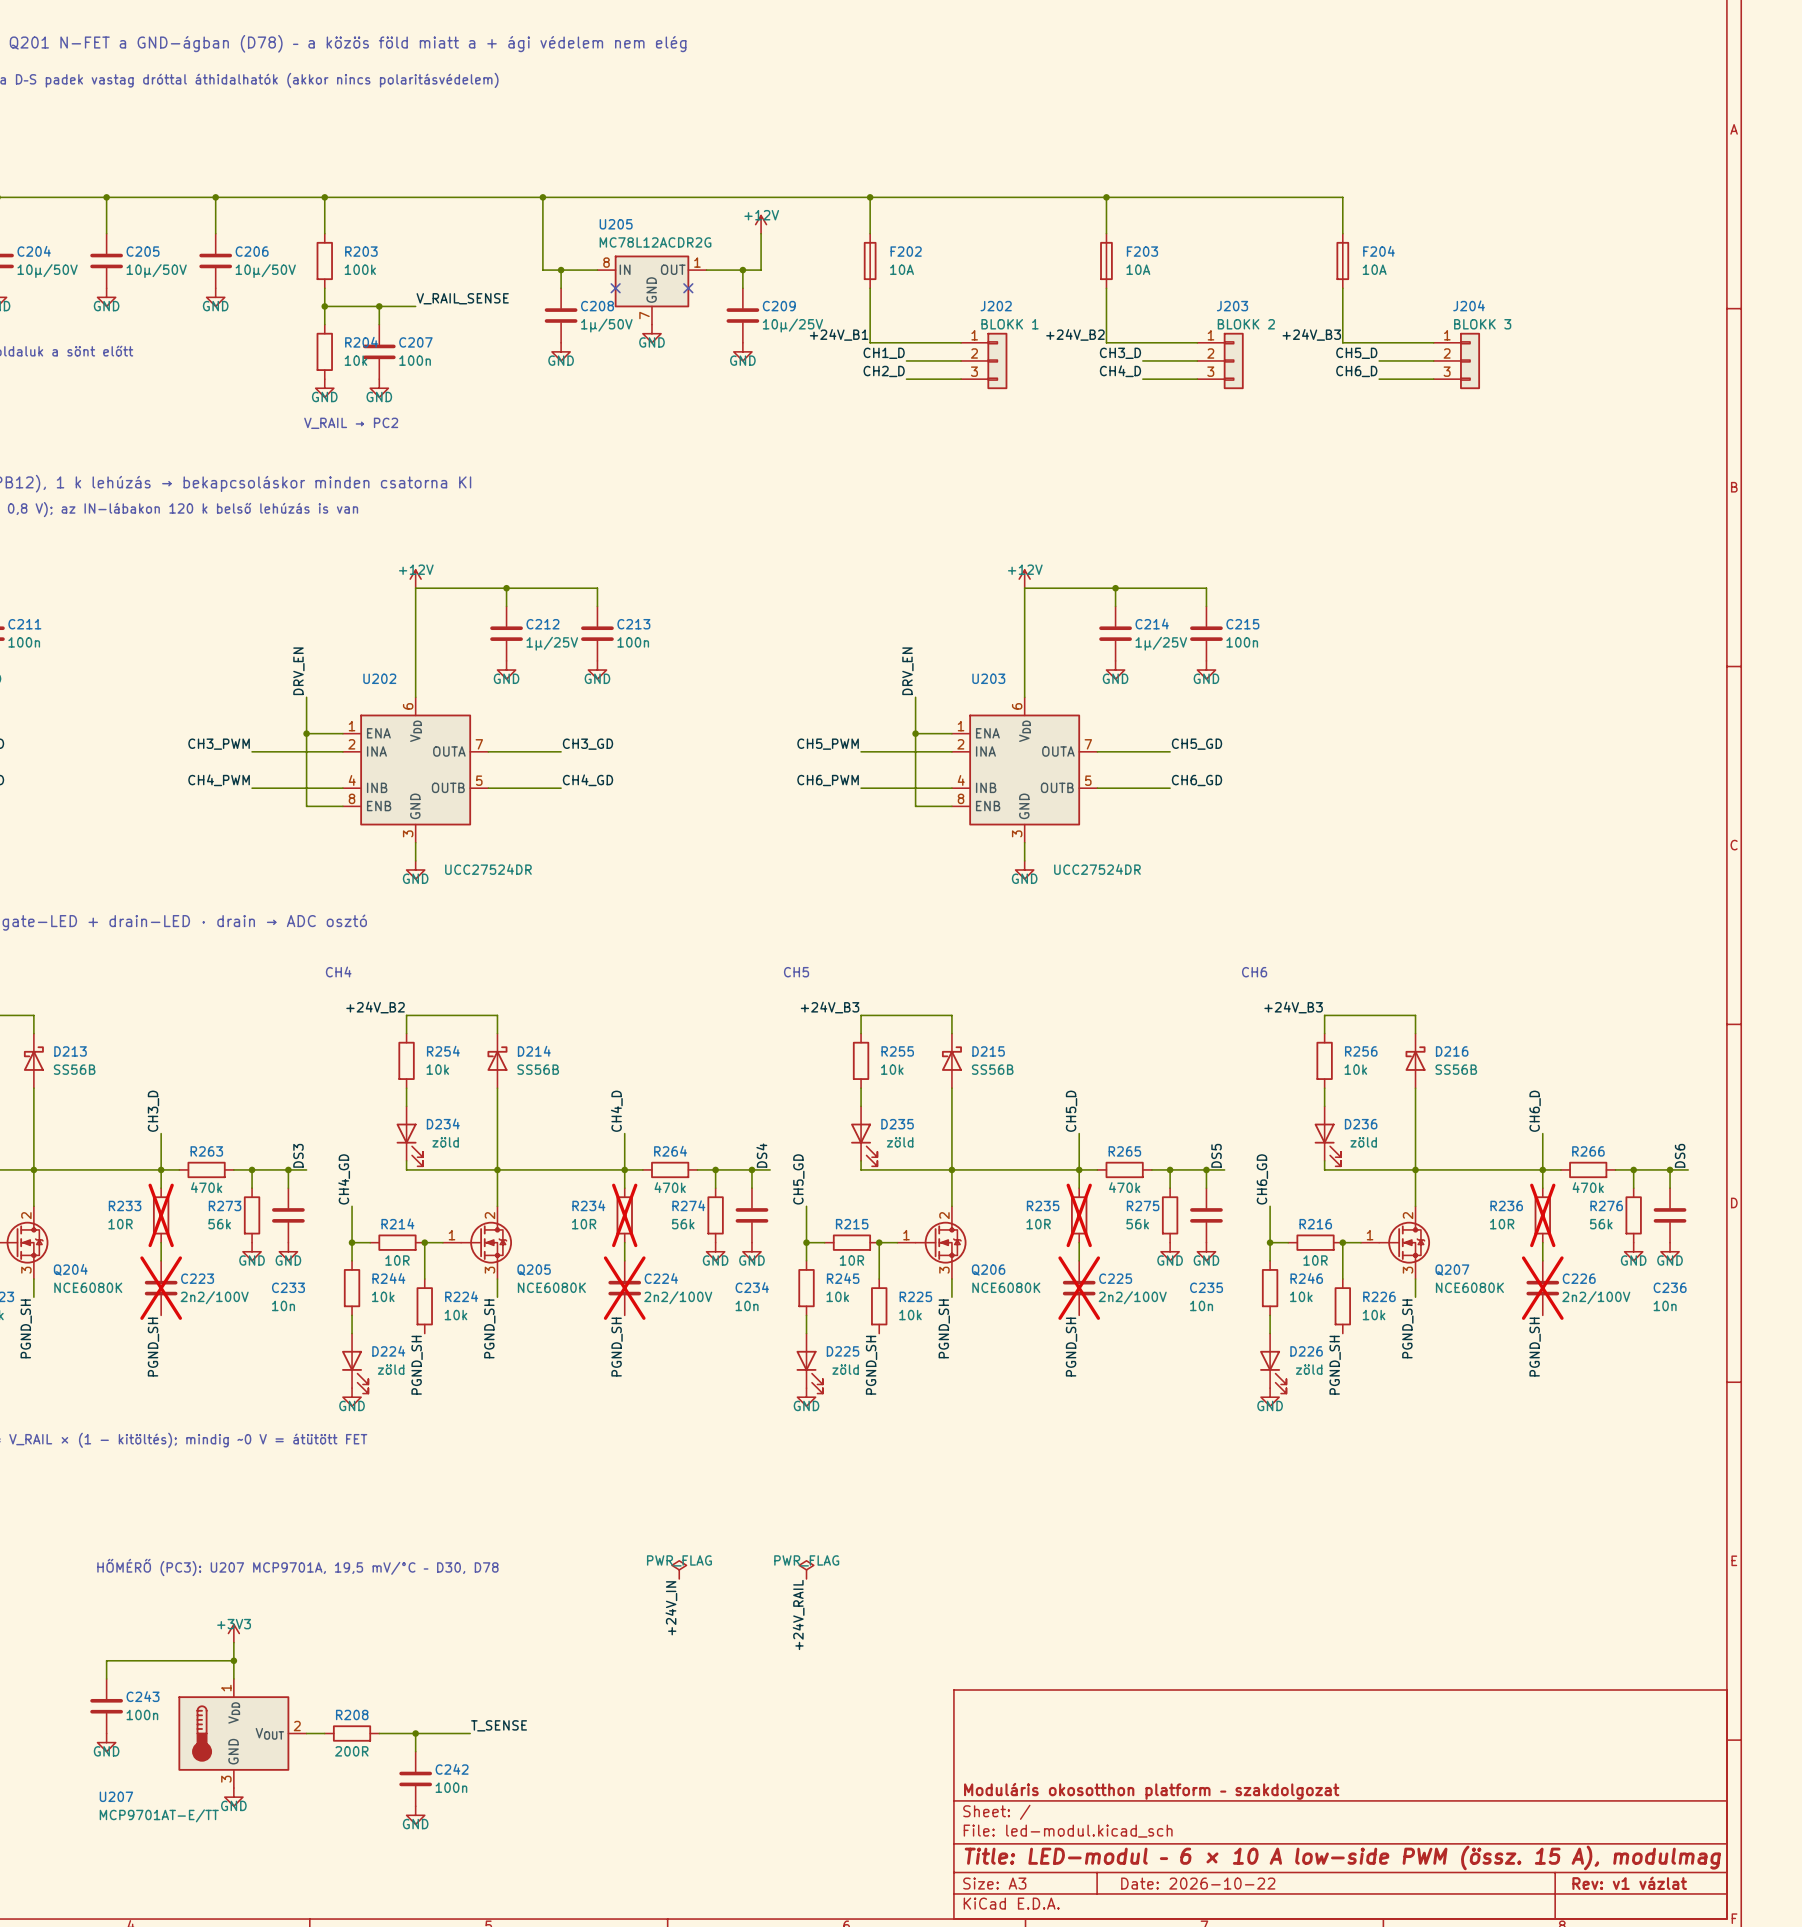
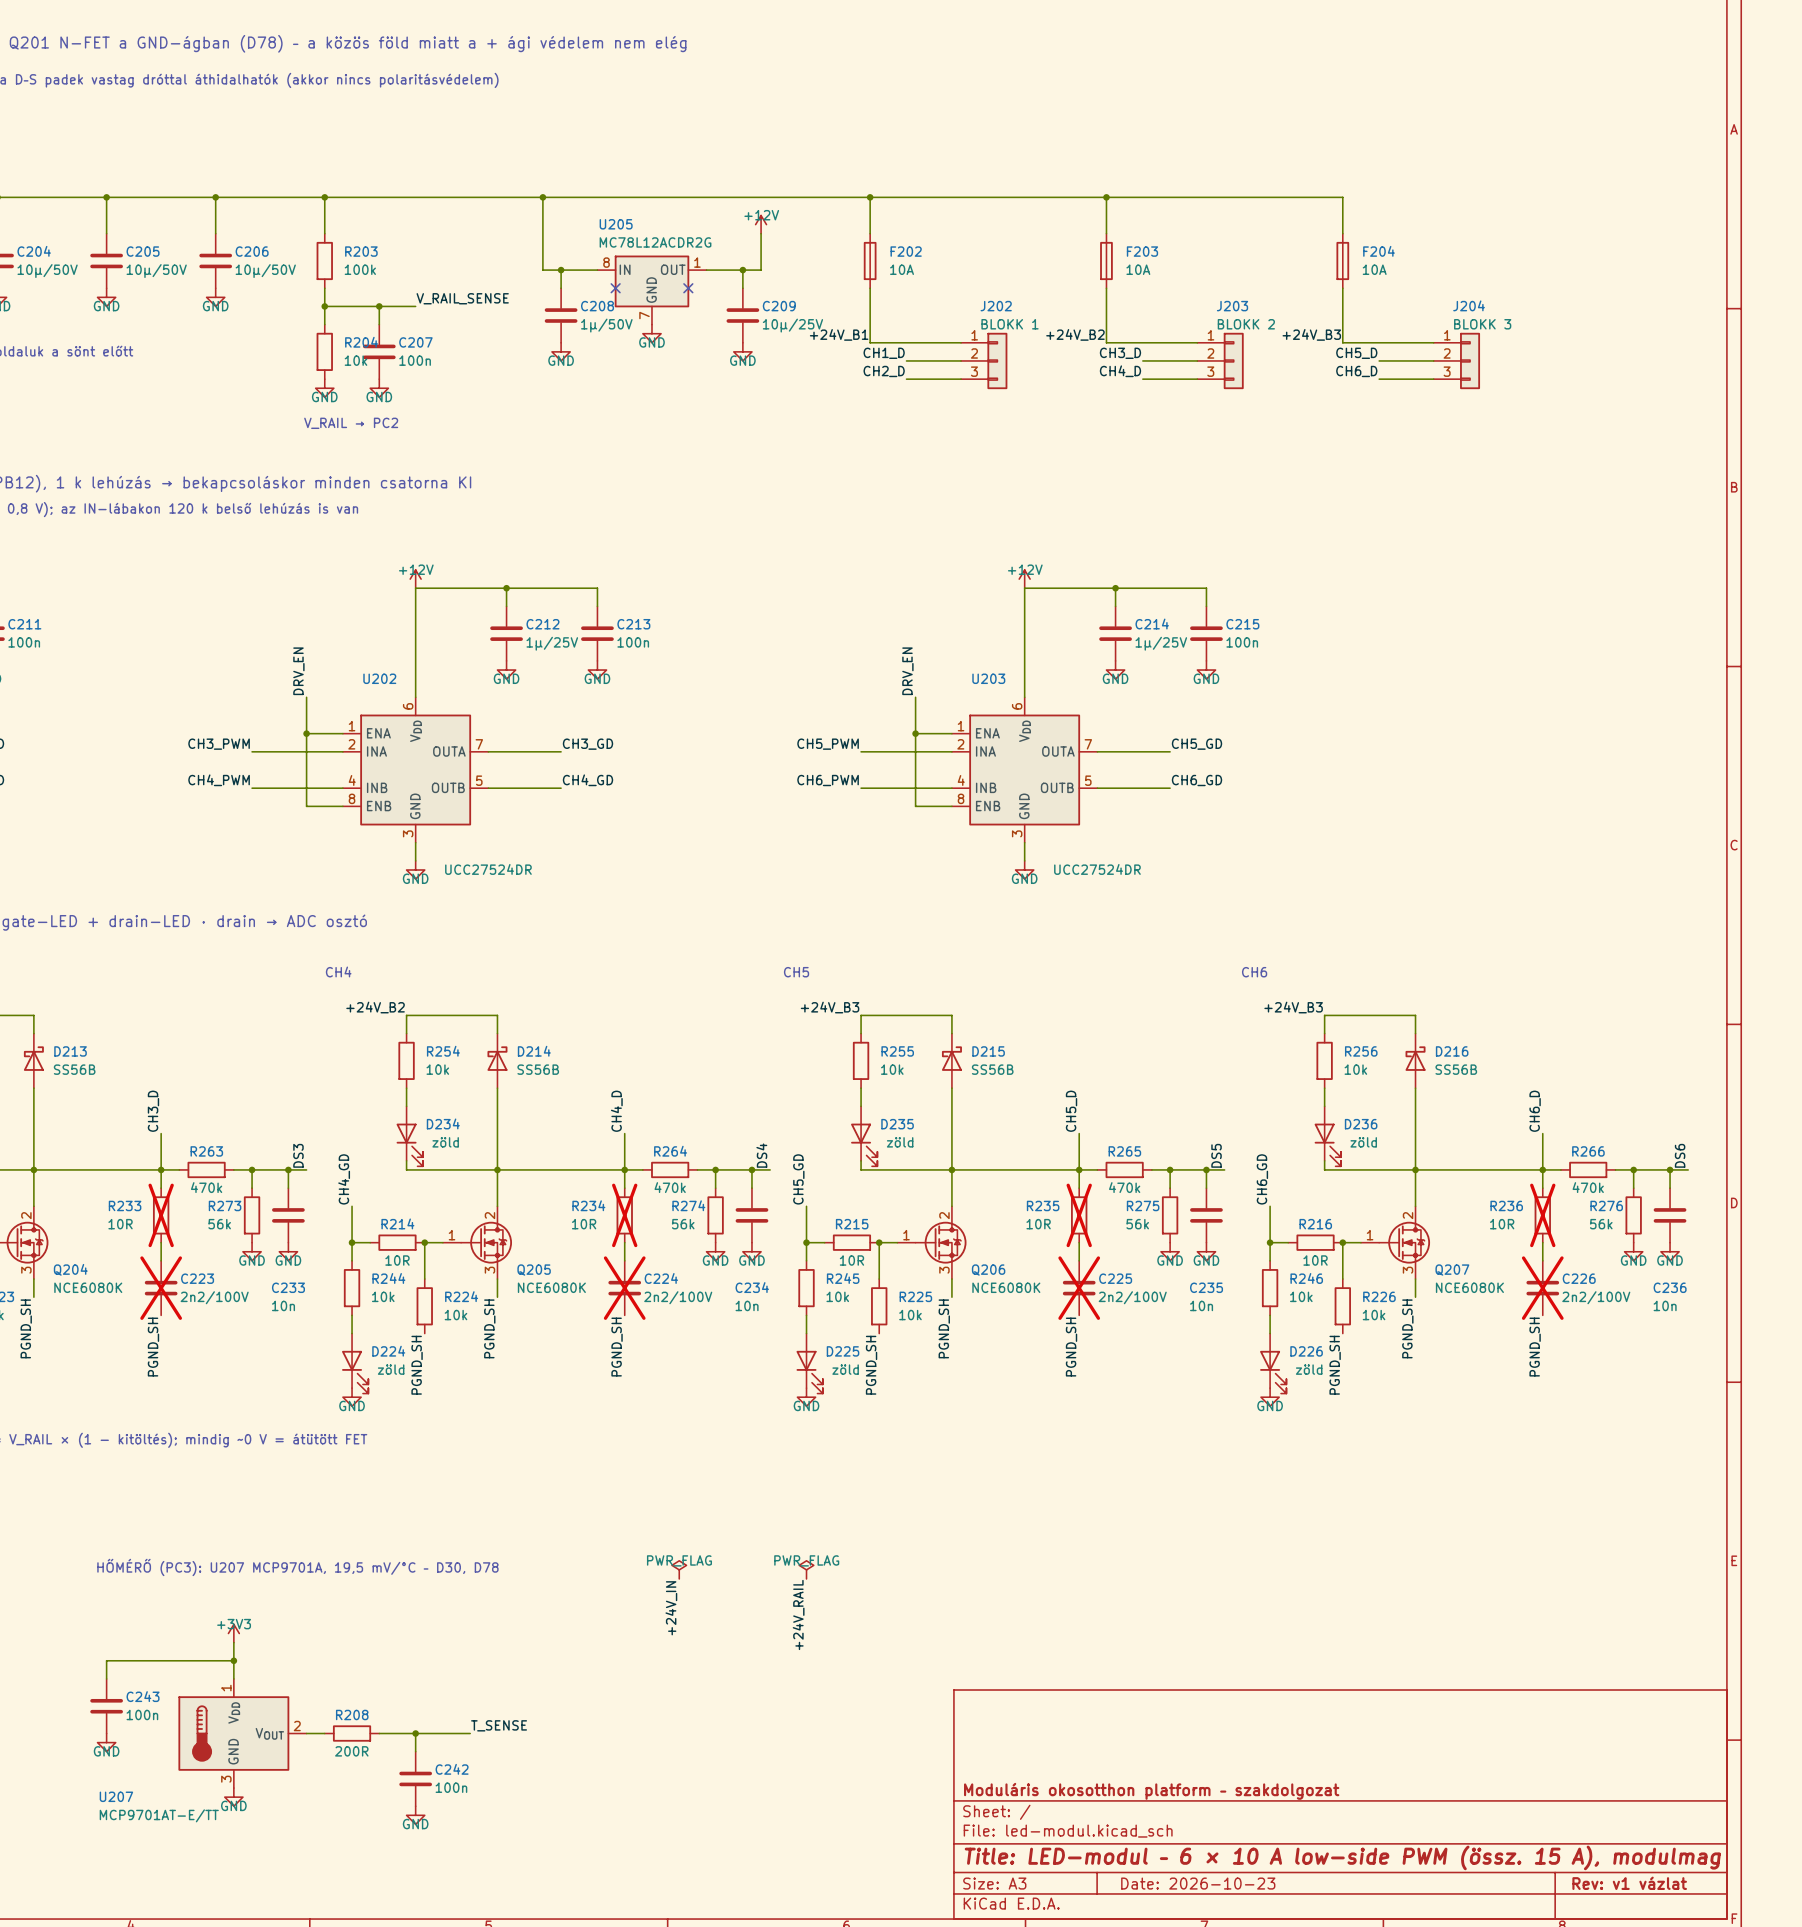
title block: Date: 2026-10-22 (1198, 1883) -> Date: 2026-10-23 (1198, 1883)

